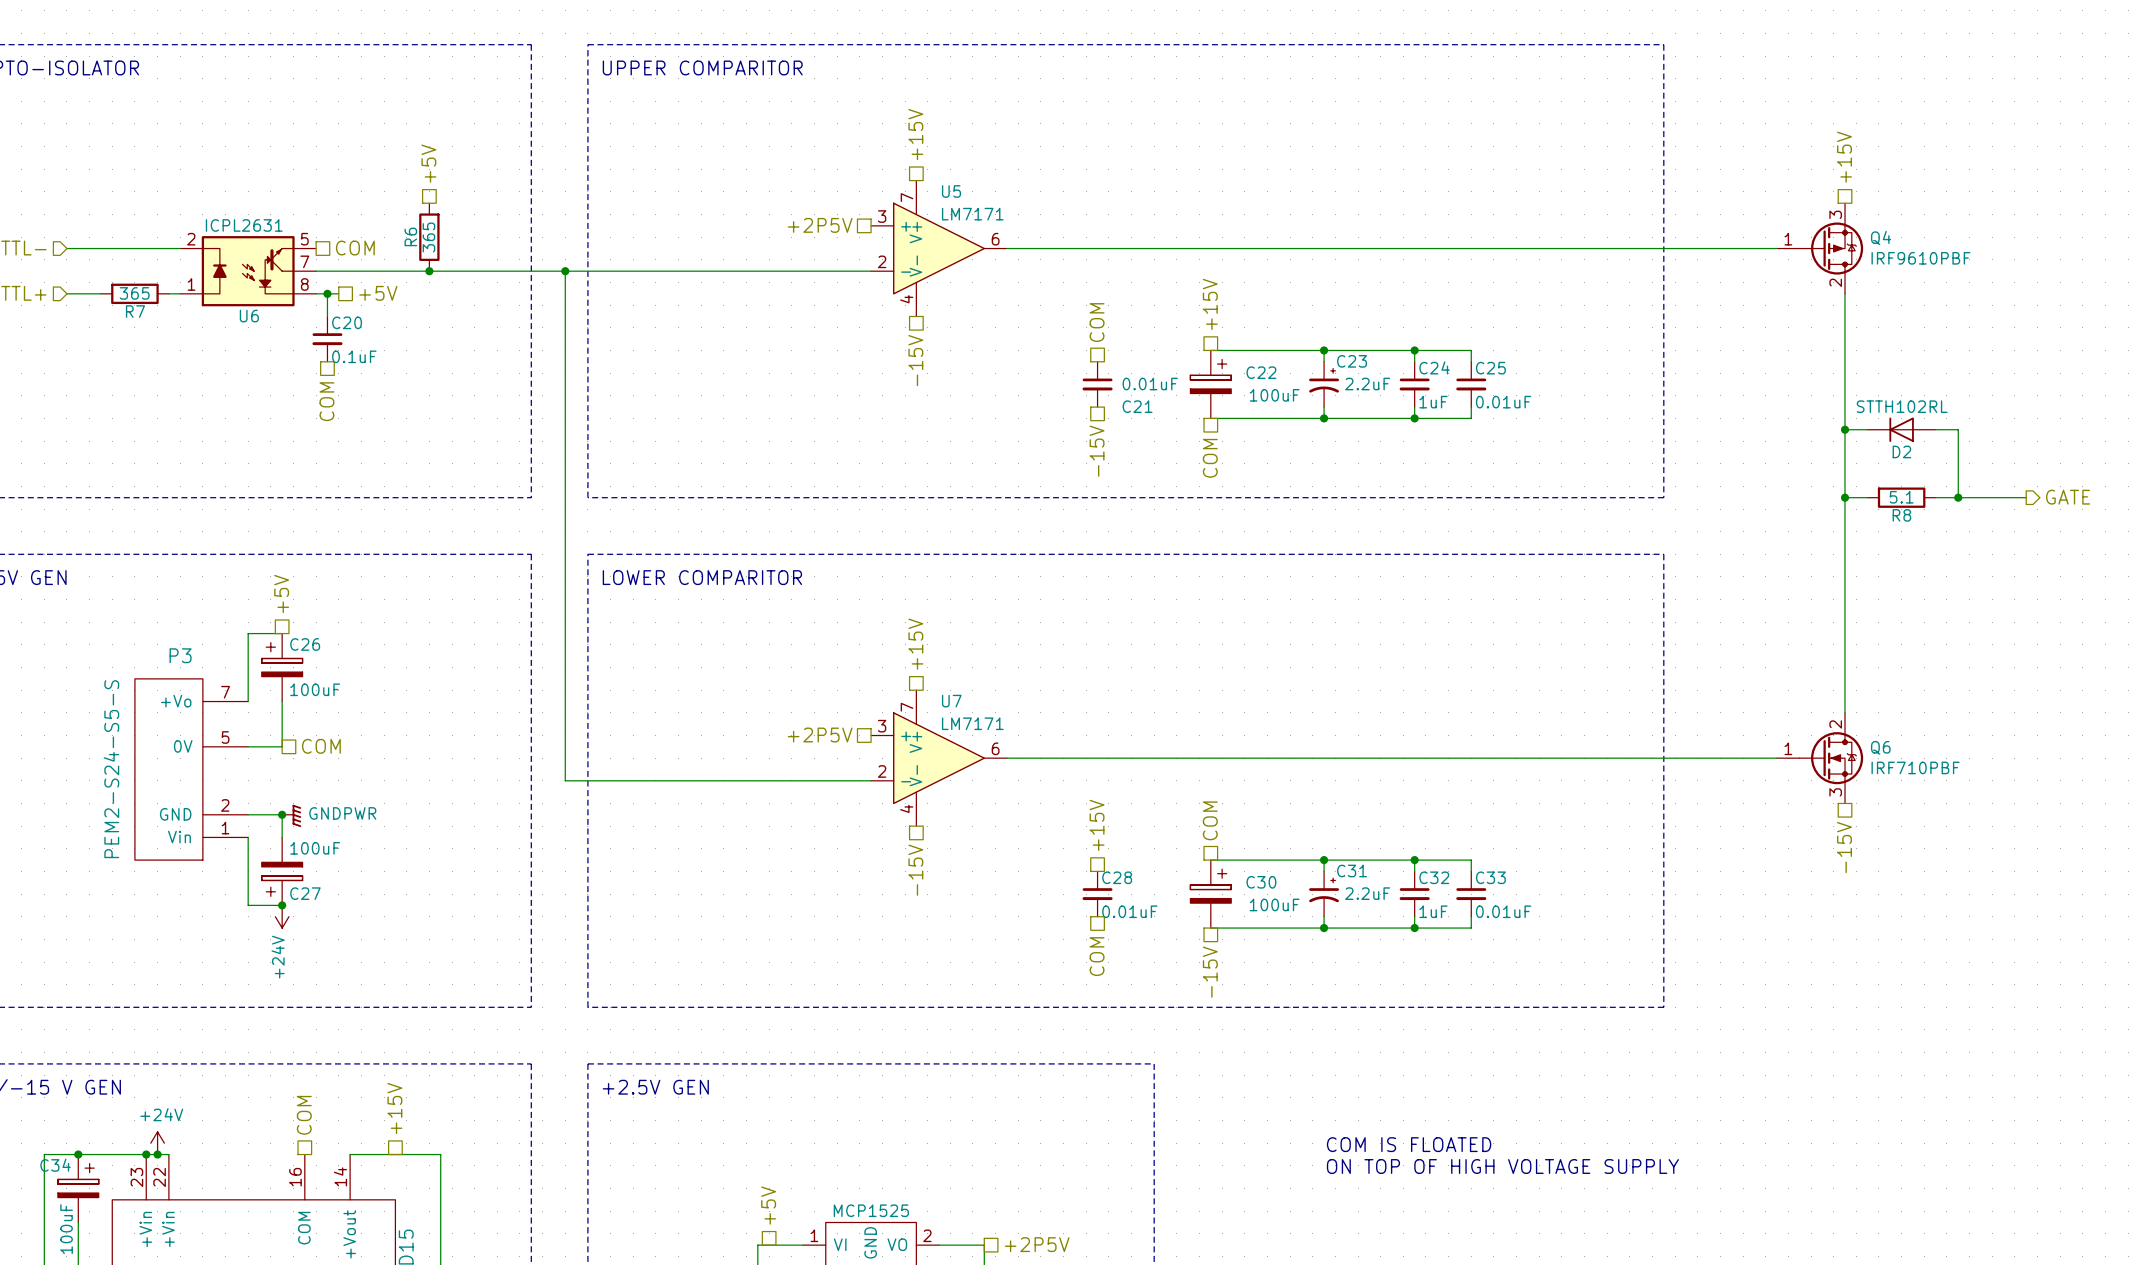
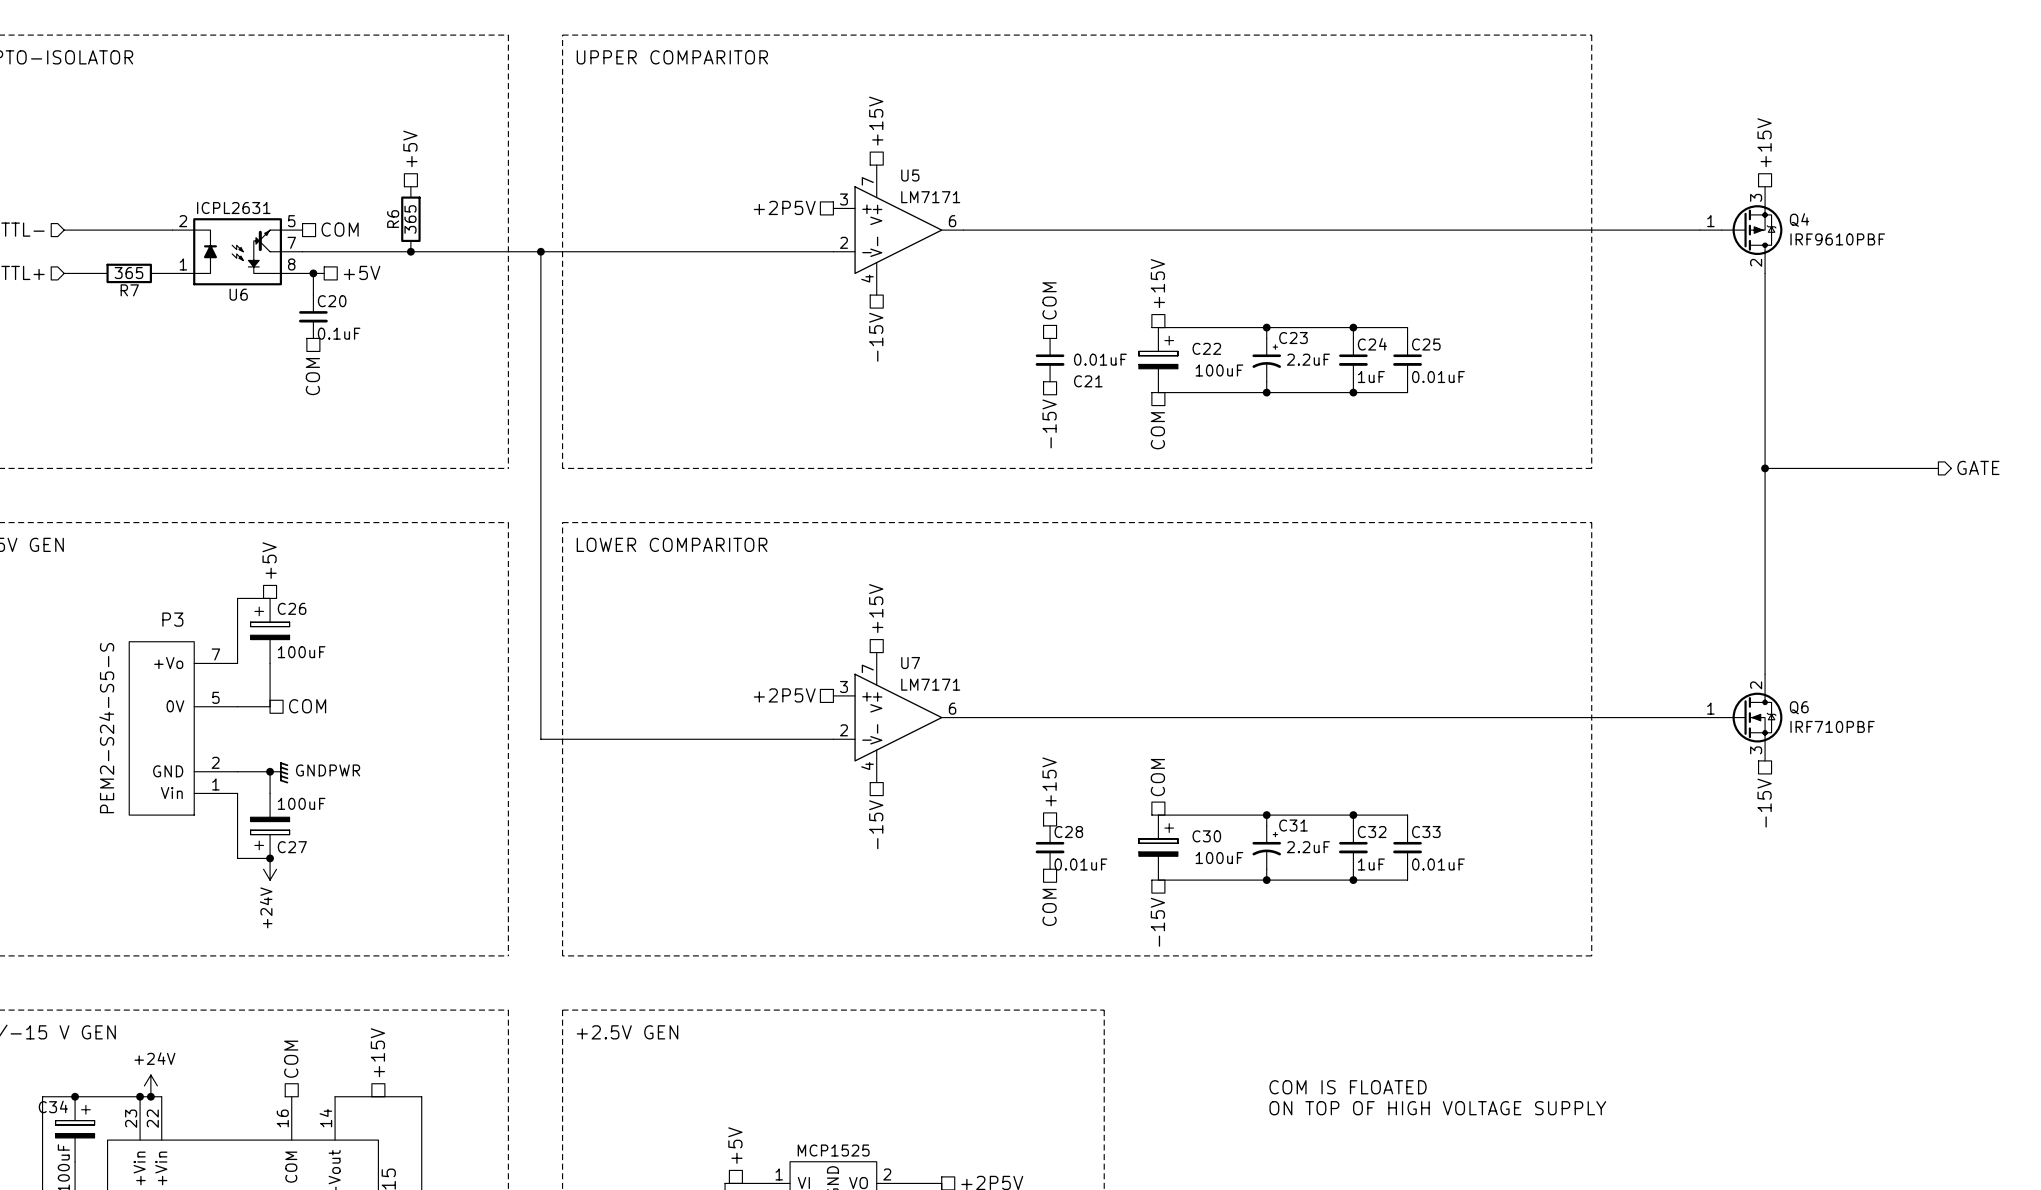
wire: (1845, 429) (1867, 429) -> none
junction: (1845, 429) -> none
D2: STTH102RL (1901, 429) -> none
wire: (1935, 429) (1958, 429) (1958, 497) -> none
wire: none -> (1786, 468) (1851, 468)
R8: 5.1 (1901, 497) -> none
junction: (1958, 497) -> none

